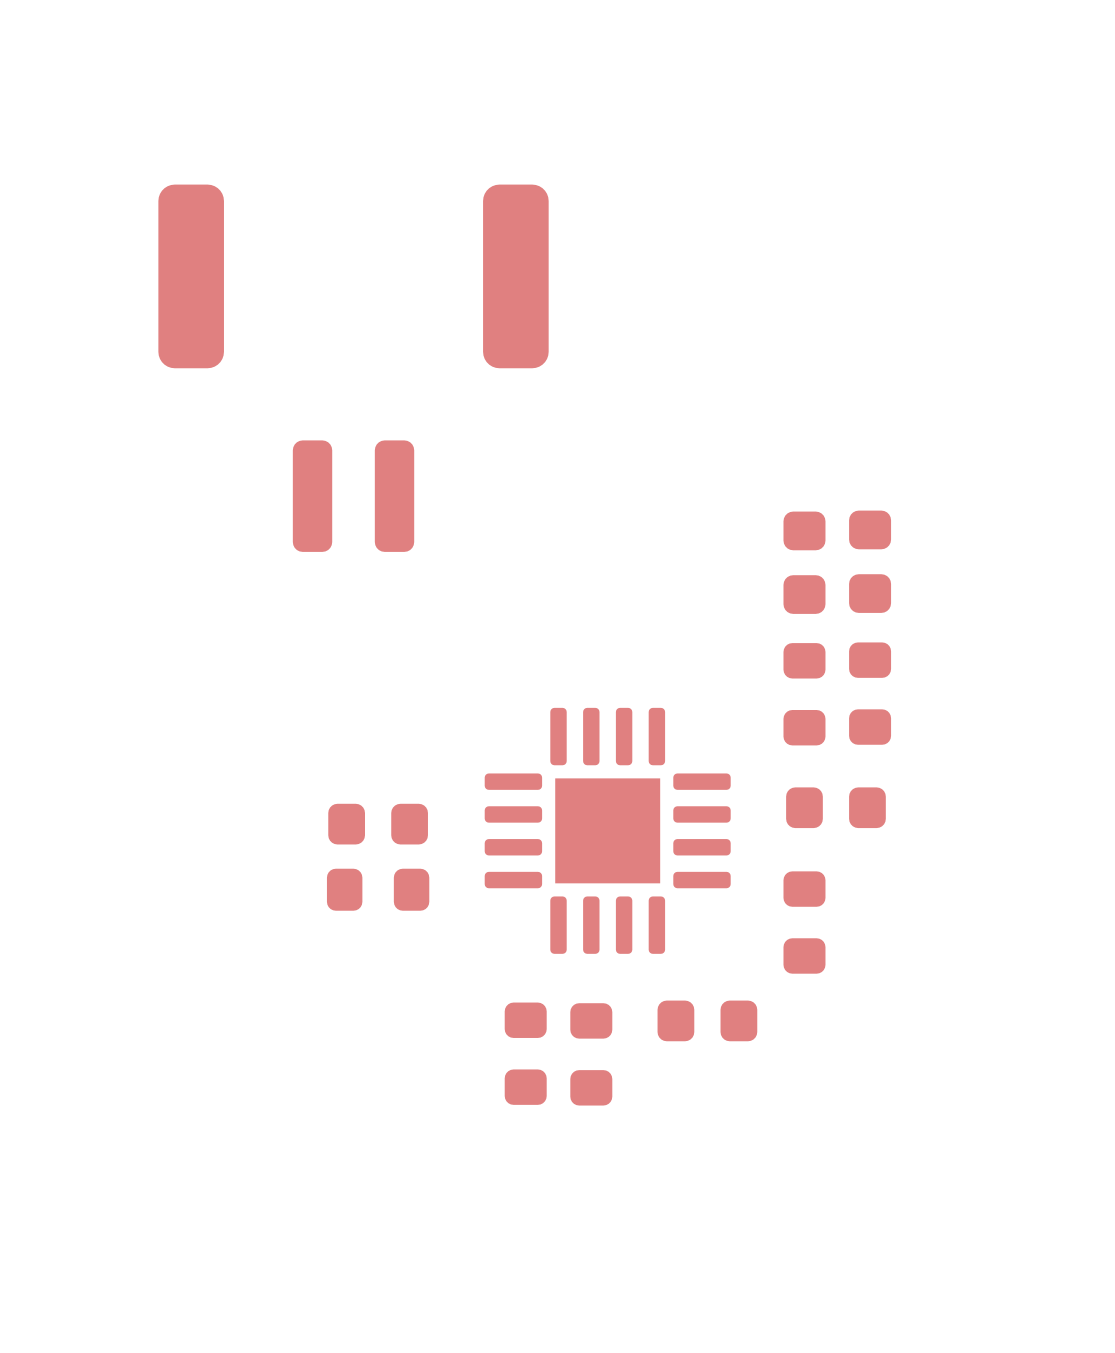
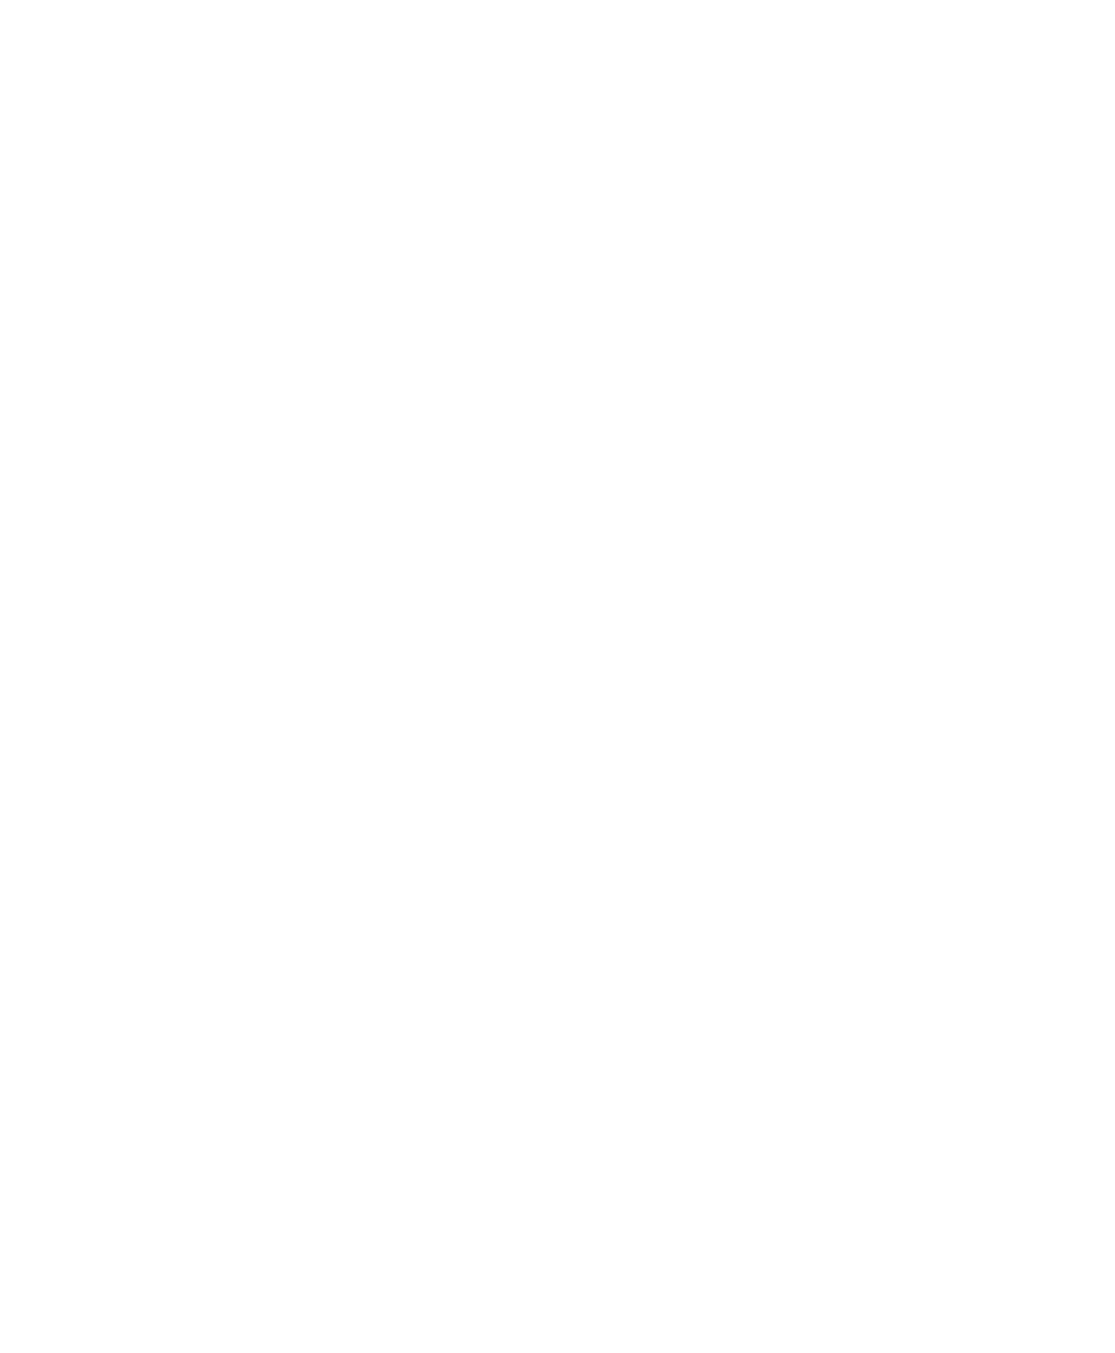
part: (353, 368) -> none
part: (870, 561) -> none
part: (804, 562) -> none
part: (870, 693) -> none
part: (804, 694) -> none
part: (835, 807) -> none
part: (378, 824) -> none
part: (607, 830) -> none
part: (378, 889) -> none
part: (804, 922) -> none
part: (707, 1020) -> none
part: (525, 1053) -> none
part: (591, 1054) -> none

